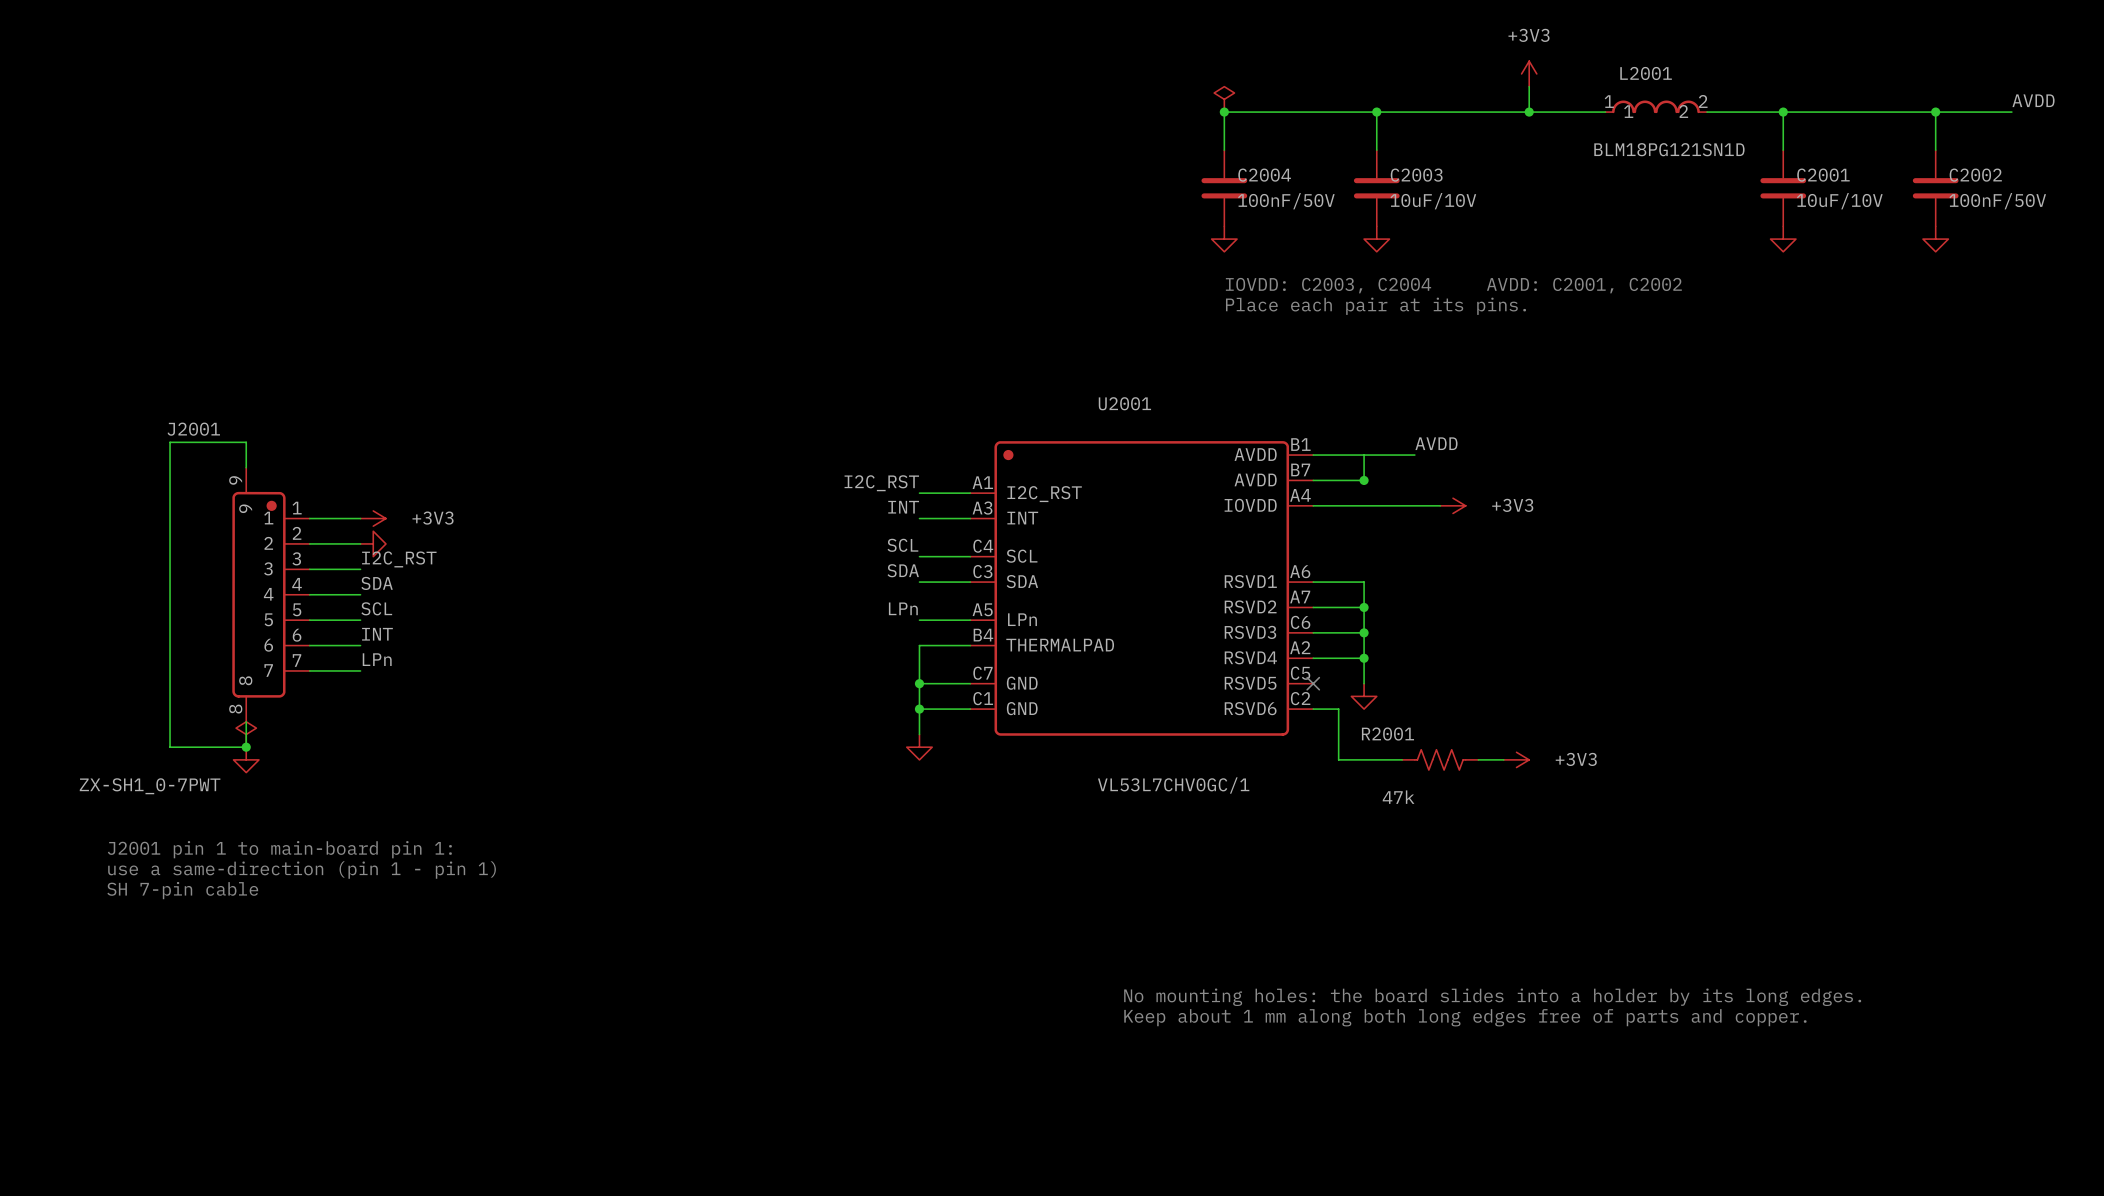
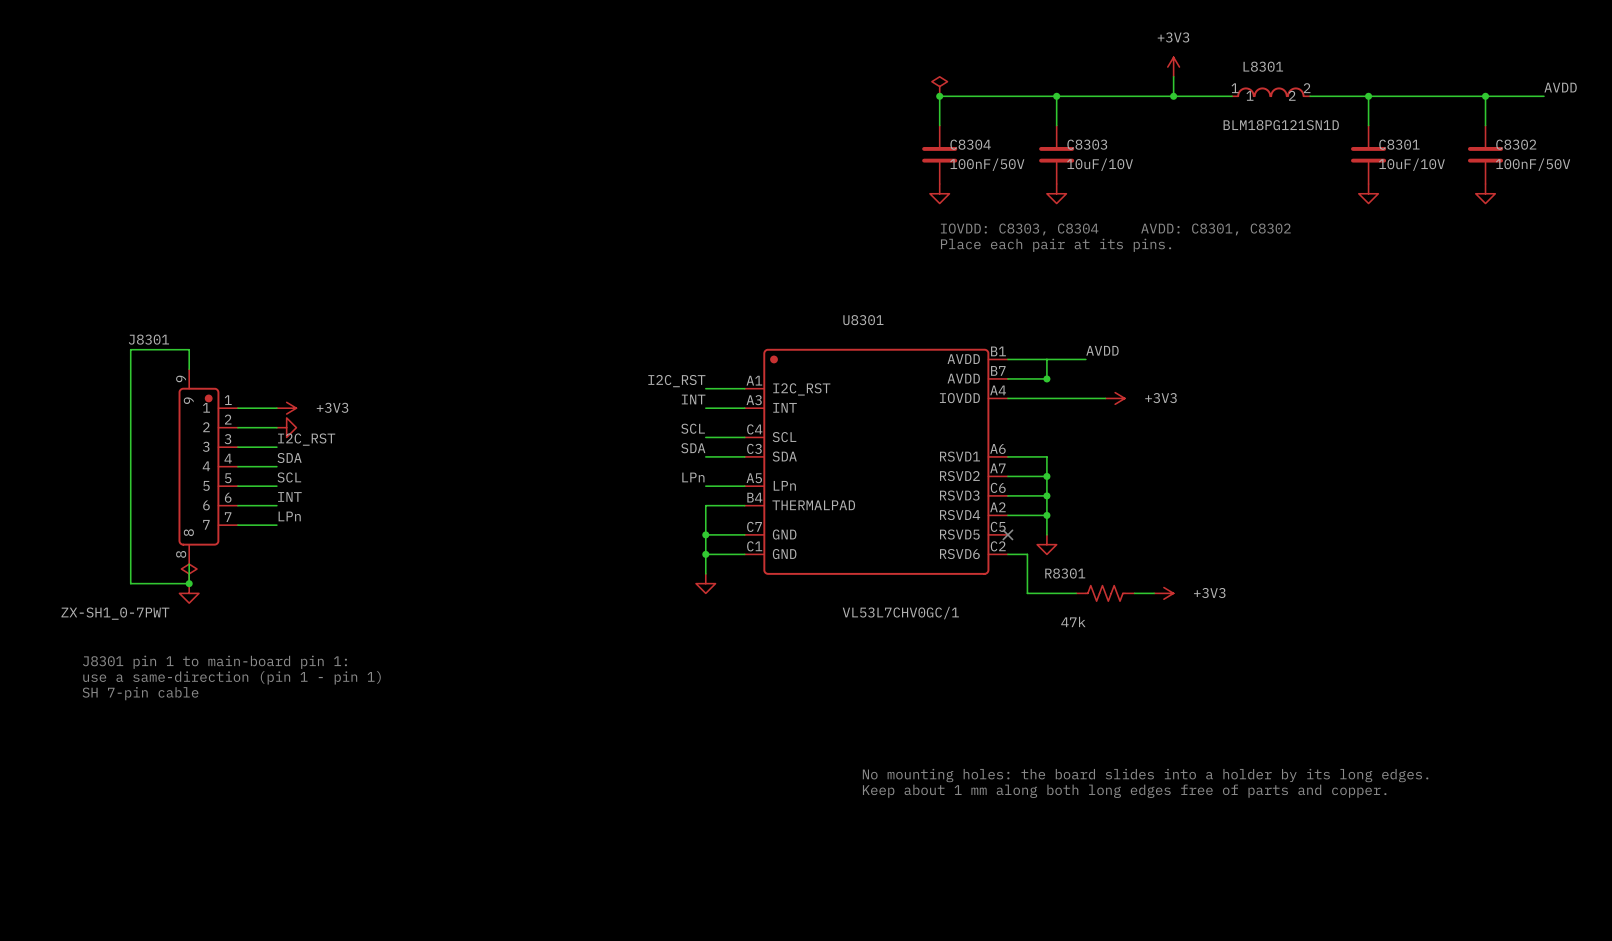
L2001 name: L2001 (1646, 73) -> L8301 (1263, 66)
C2004 name: C2004 (1264, 175) -> C8304 (970, 144)
C2003 name: C2003 (1416, 175) -> C8303 (1087, 144)
C2001 name: C2001 (1823, 175) -> C8301 (1399, 144)
C2002 name: C2002 (1975, 175) -> C8302 (1516, 144)
text: IOVDD: C2003, C2004 AVDD: C2001, C2002 (1453, 285) -> IOVDD: C8303, C8304 AVDD: C8301, C8302 (1115, 229)
U2001 name: U2001 (1124, 403) -> U8301 (863, 320)
J2001 name: J2001 (193, 429) -> J8301 (148, 339)
R2001 name: R2001 (1387, 734) -> R8301 (1065, 573)
text: J2001 pin 1 to main-board pin 1: (279, 849) -> J8301 pin 1 to main-board pin 1: (214, 662)

